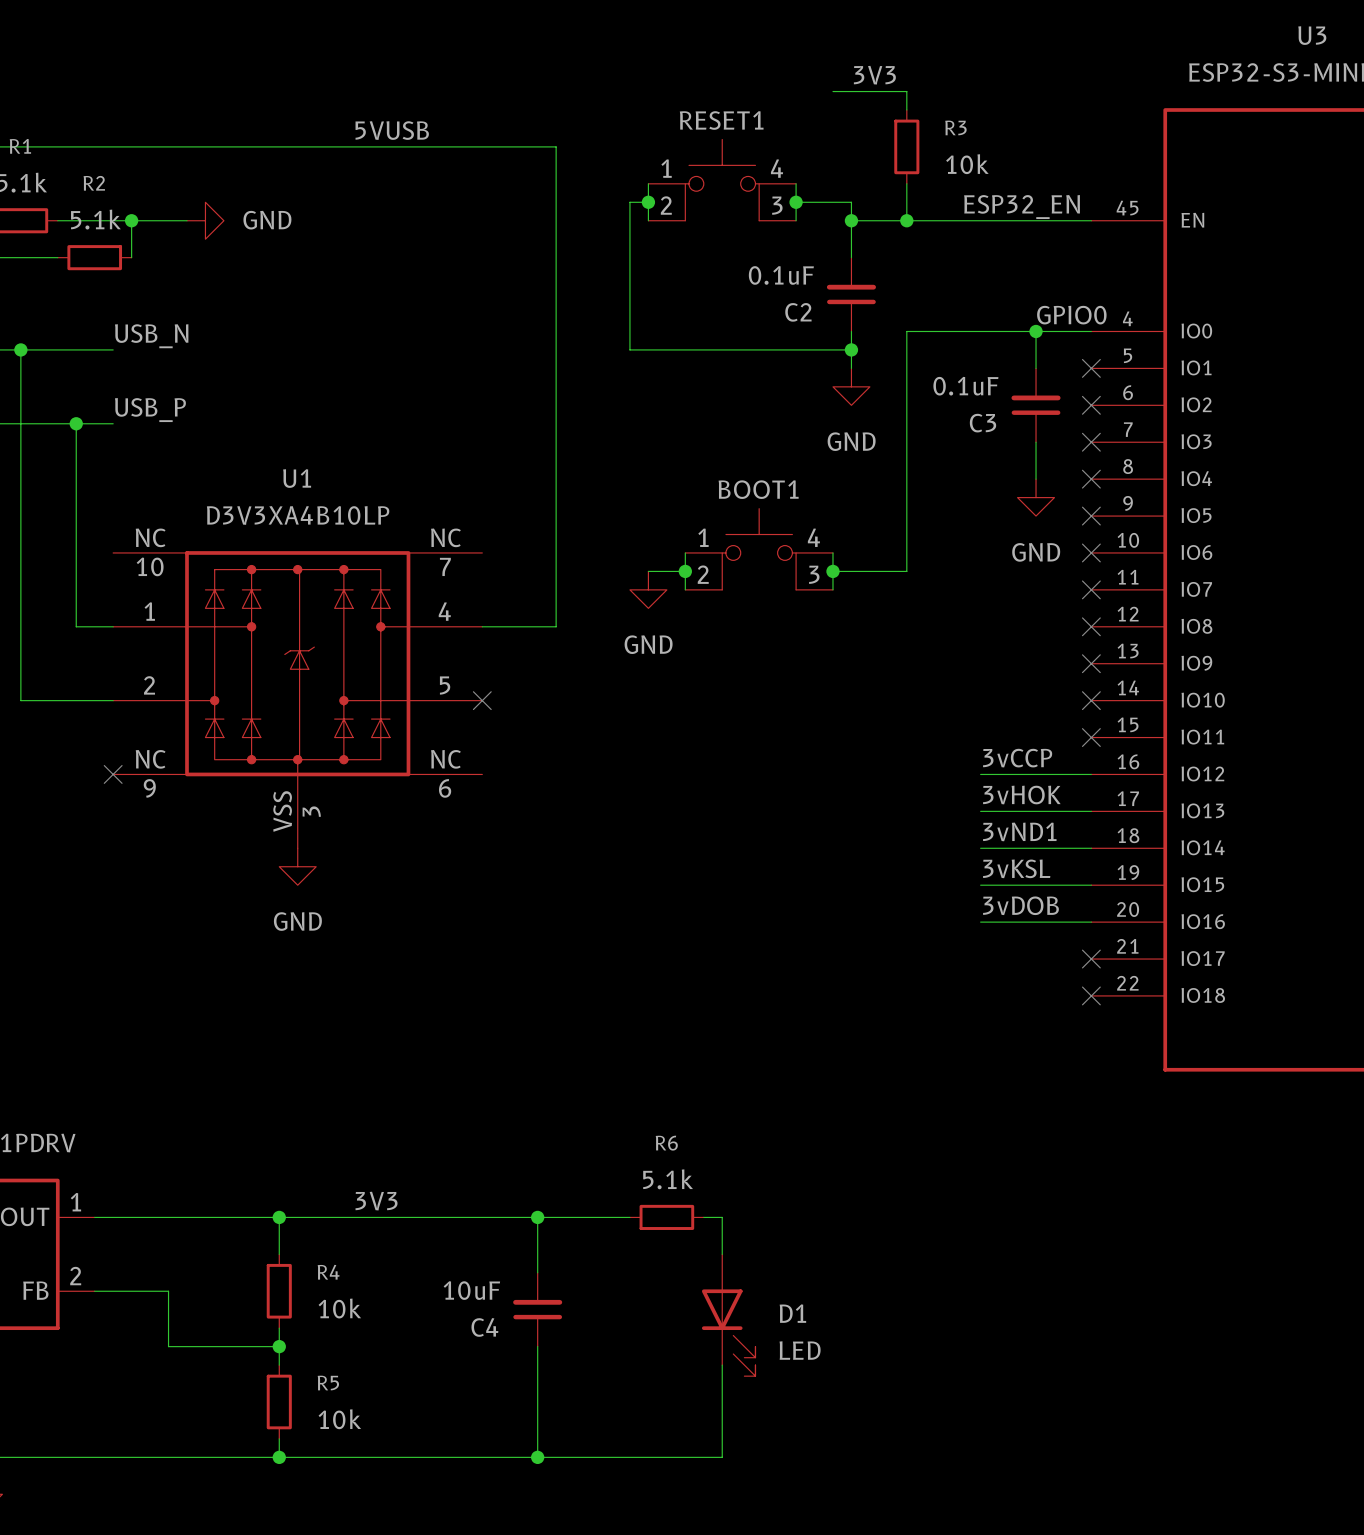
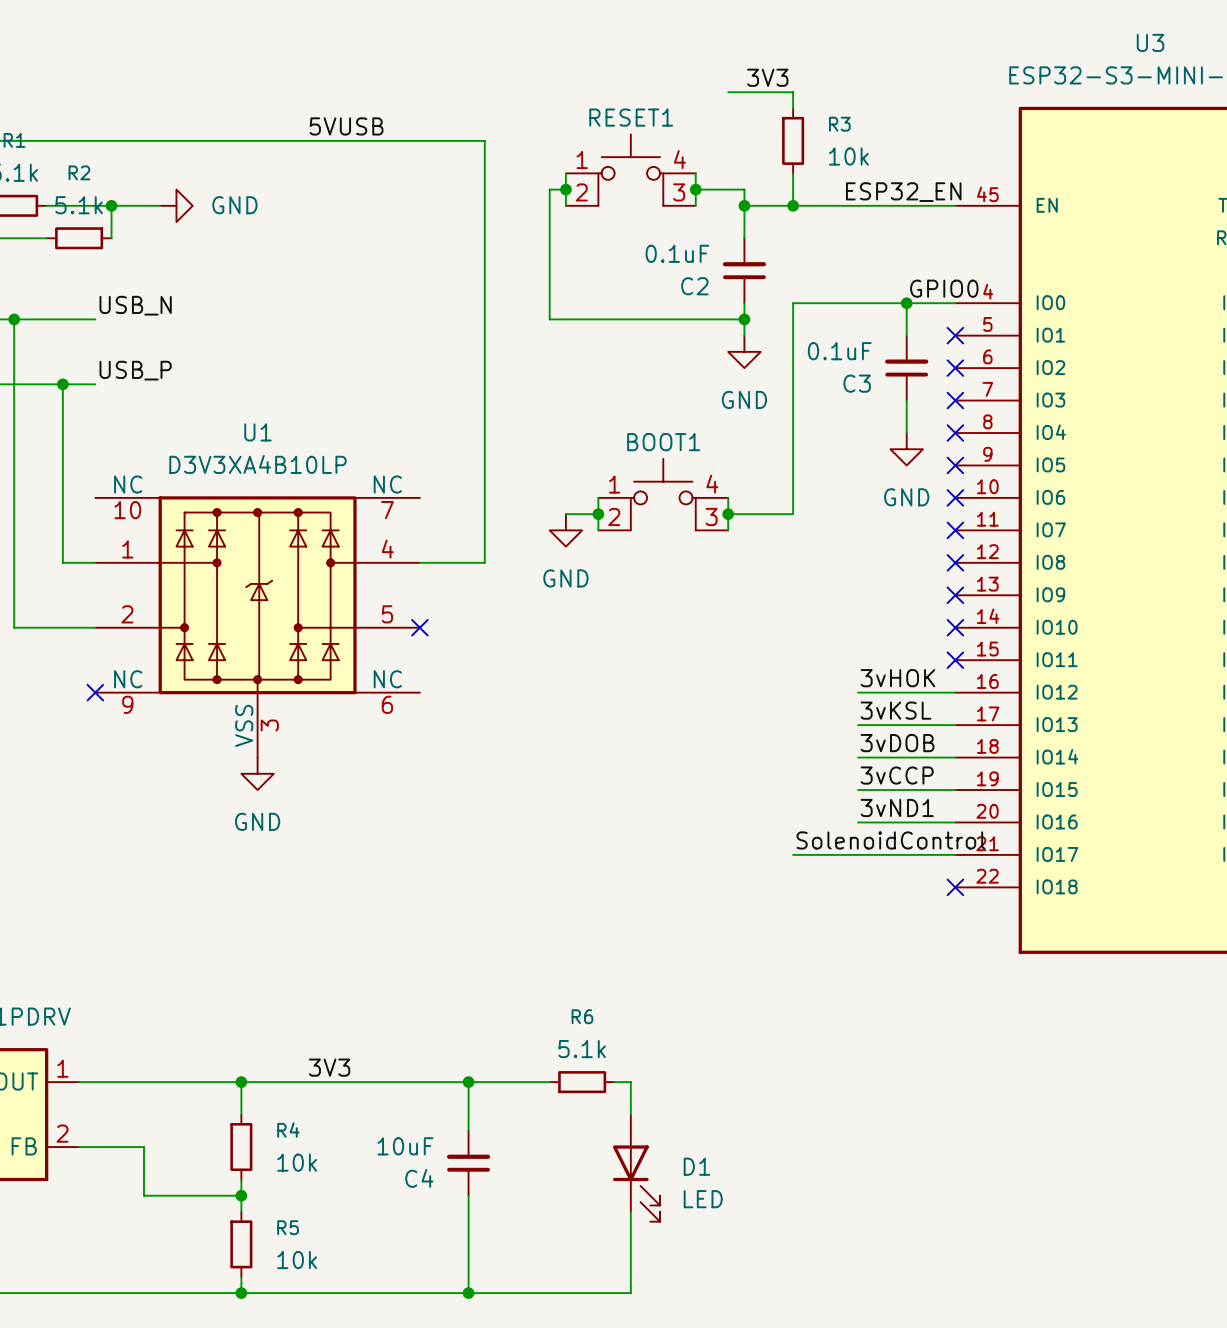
label: 3vCCP (1017, 758) -> 3vHOK (897, 678)
label: 3vHOK (1021, 795) -> 3vKSL (896, 710)
label: 3vND1 (1019, 831) -> 3vDOB (897, 743)
label: 3vKSL (1016, 868) -> 3vCCP (897, 775)
label: 3vDOB (1020, 905) -> 3vND1 (897, 807)
label: none -> SolenoidControl (890, 840)
wire: none -> (793, 854) (955, 854)
no-connect mark: (1091, 959) -> none

